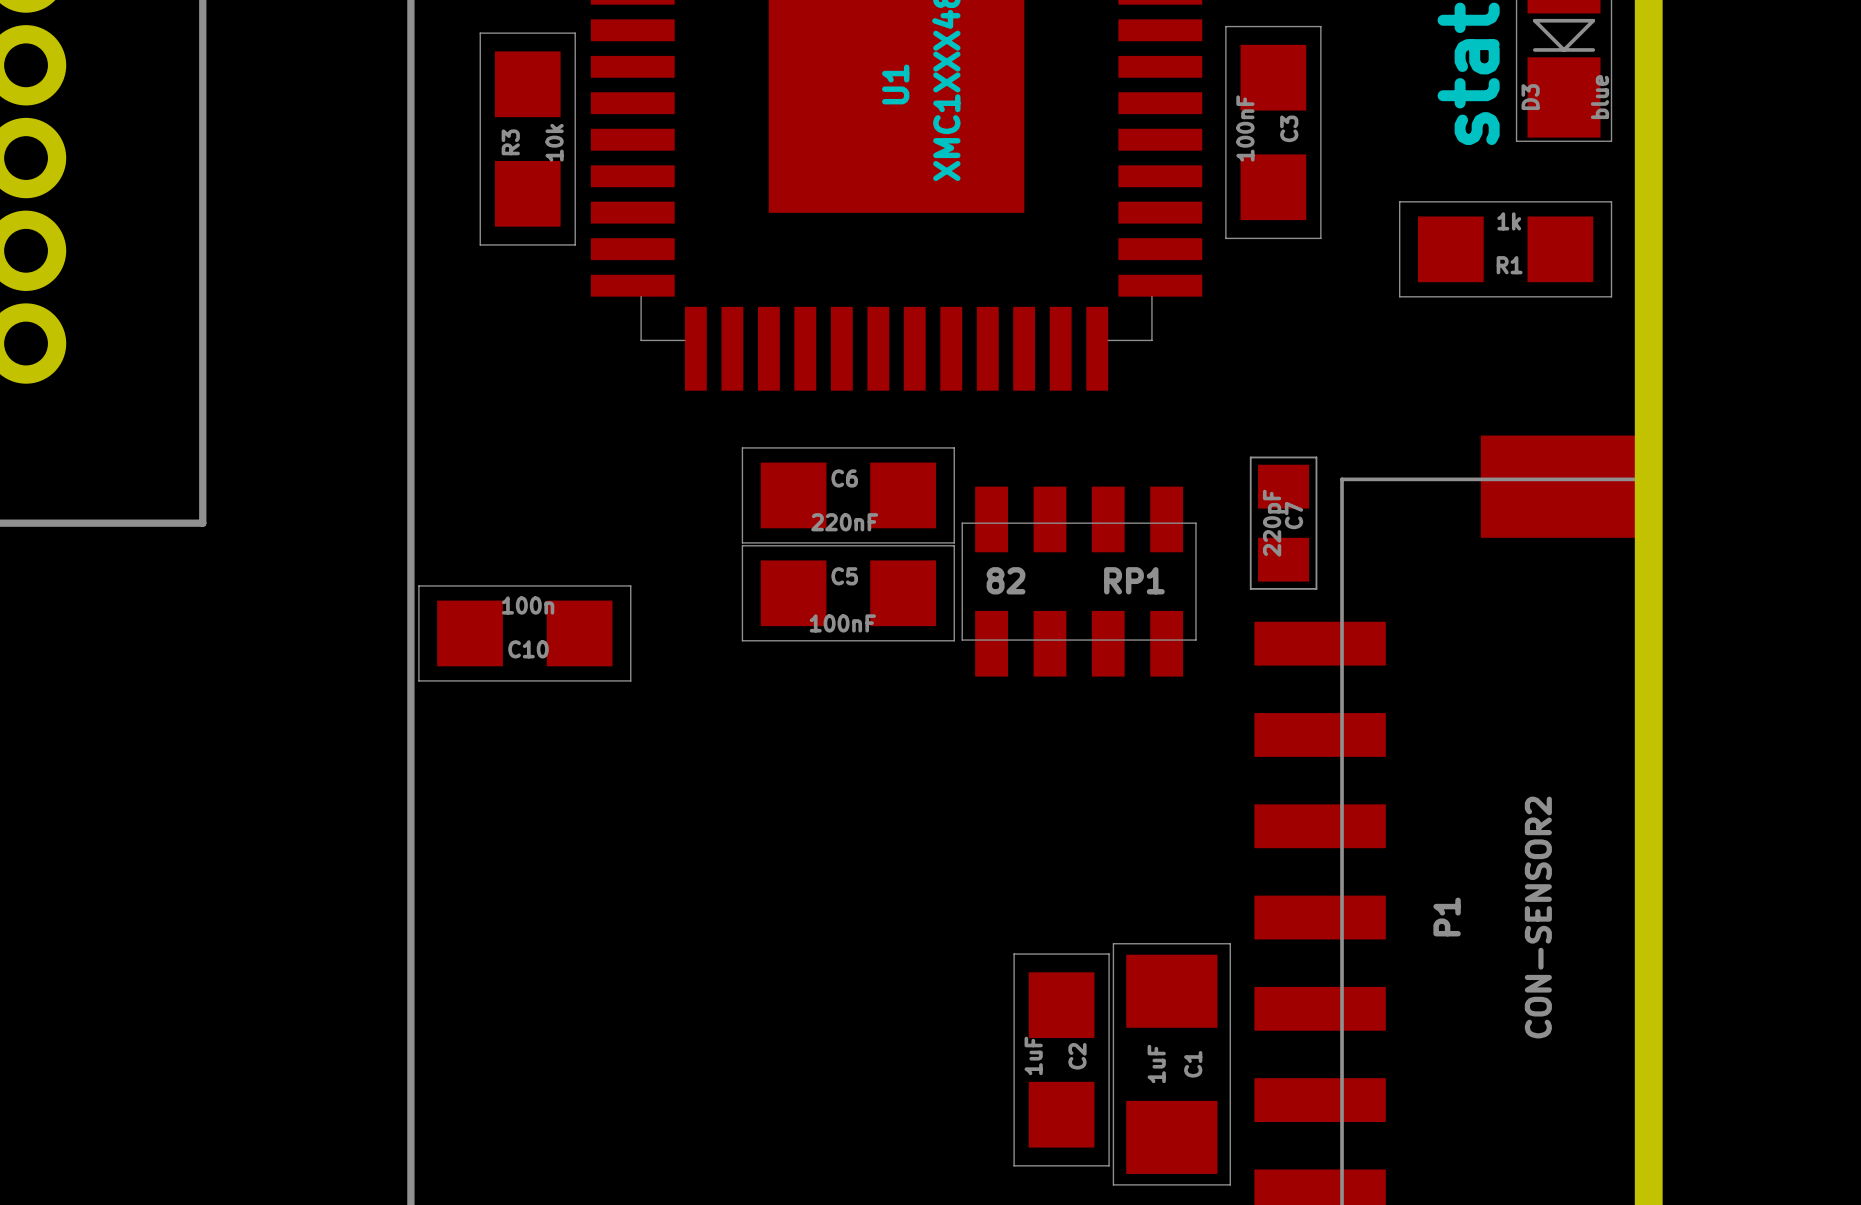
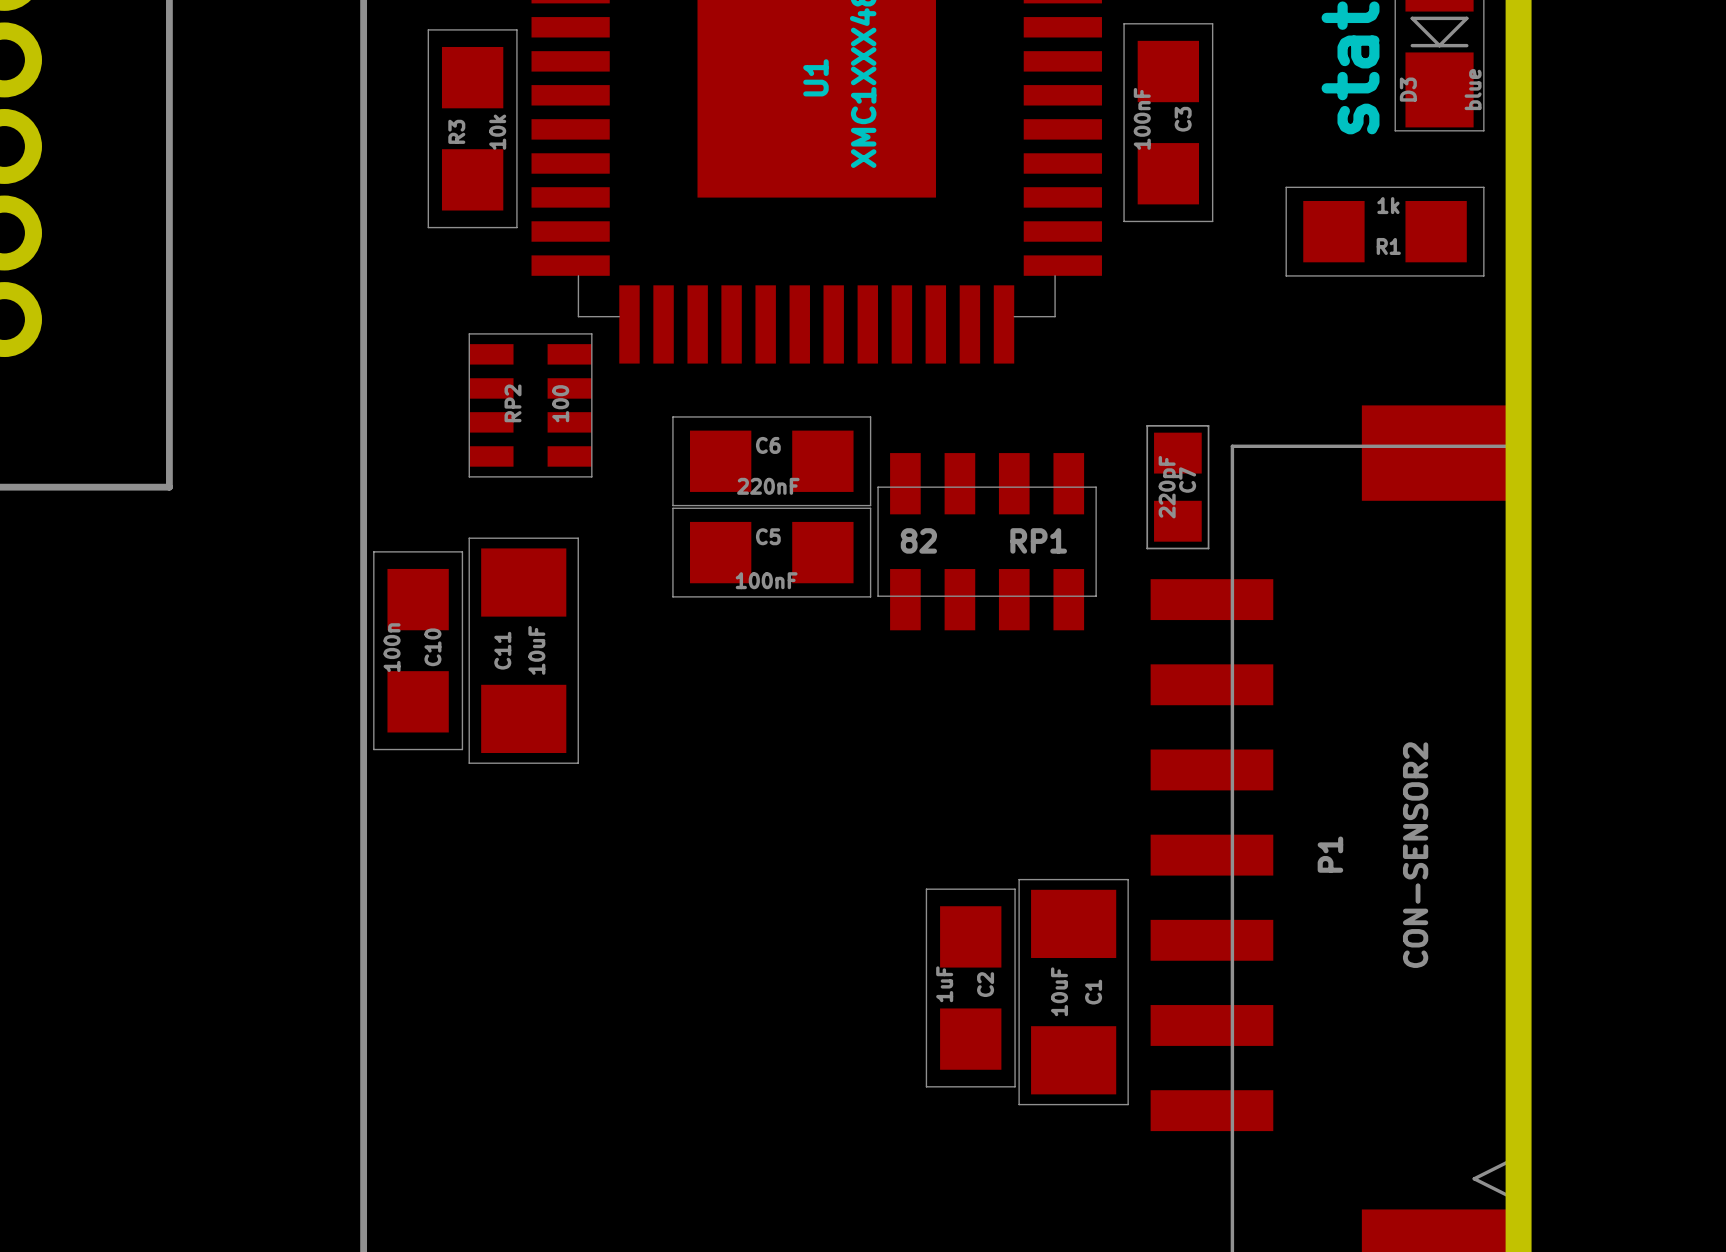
RP2: none -> 100 (530, 405)
C10 rotation: 0° (524, 633) -> 90° clockwise (418, 650)
C11: none -> 10uF (523, 650)
C1 value: 1uF (1156, 1063) -> 10uF (1059, 991)

